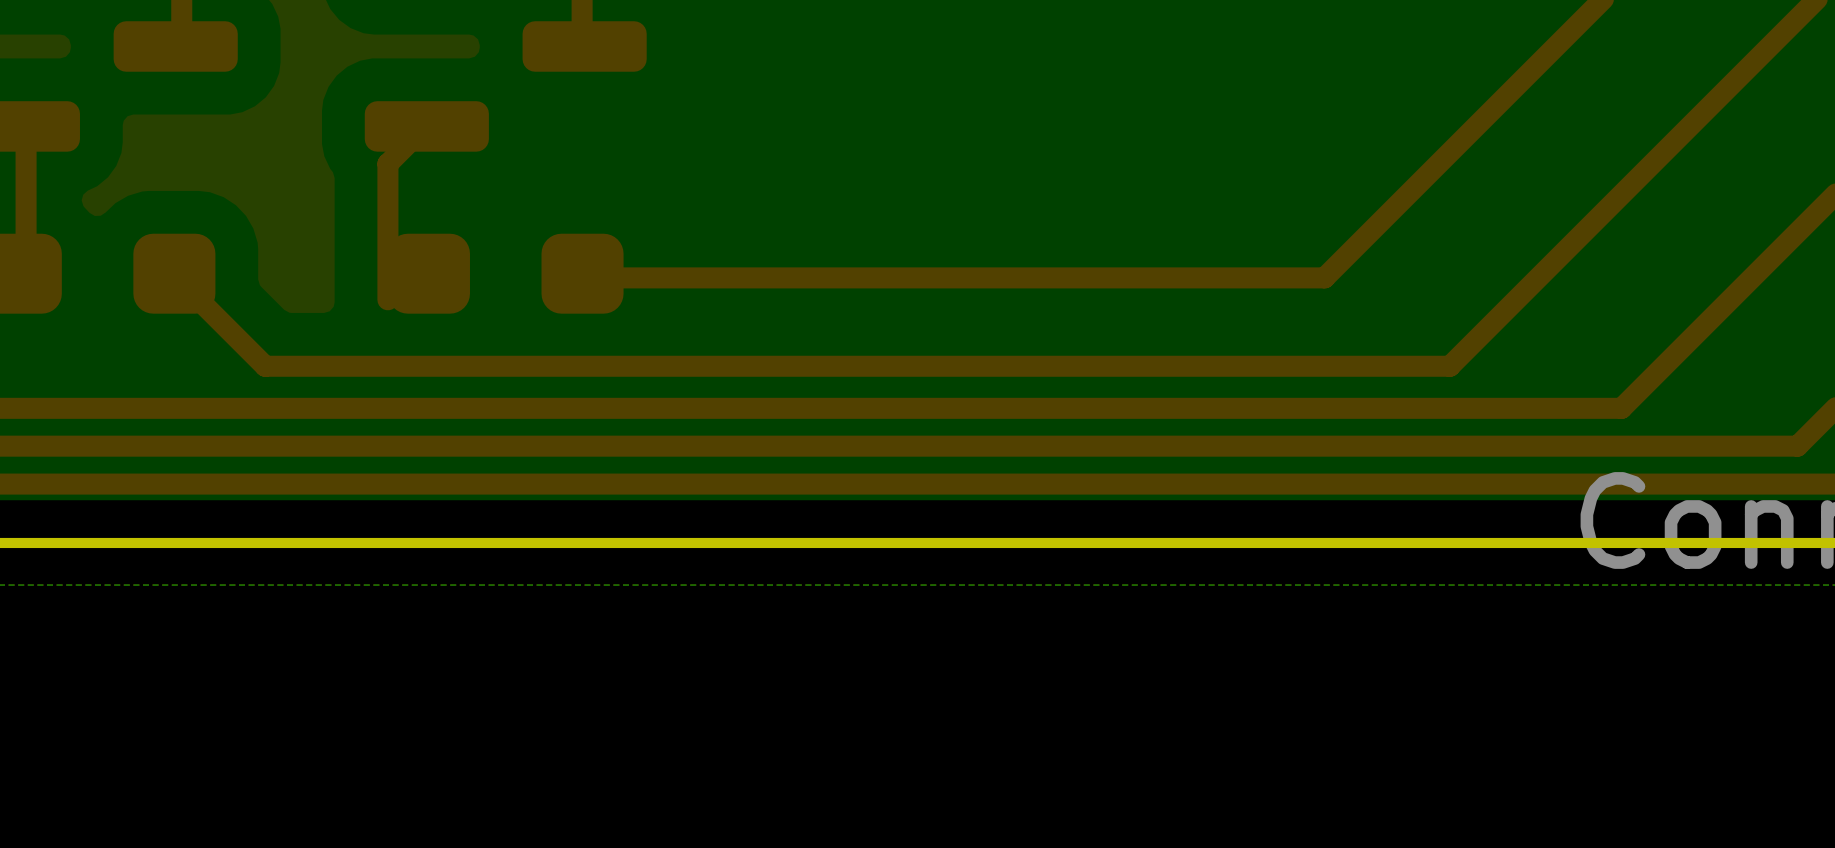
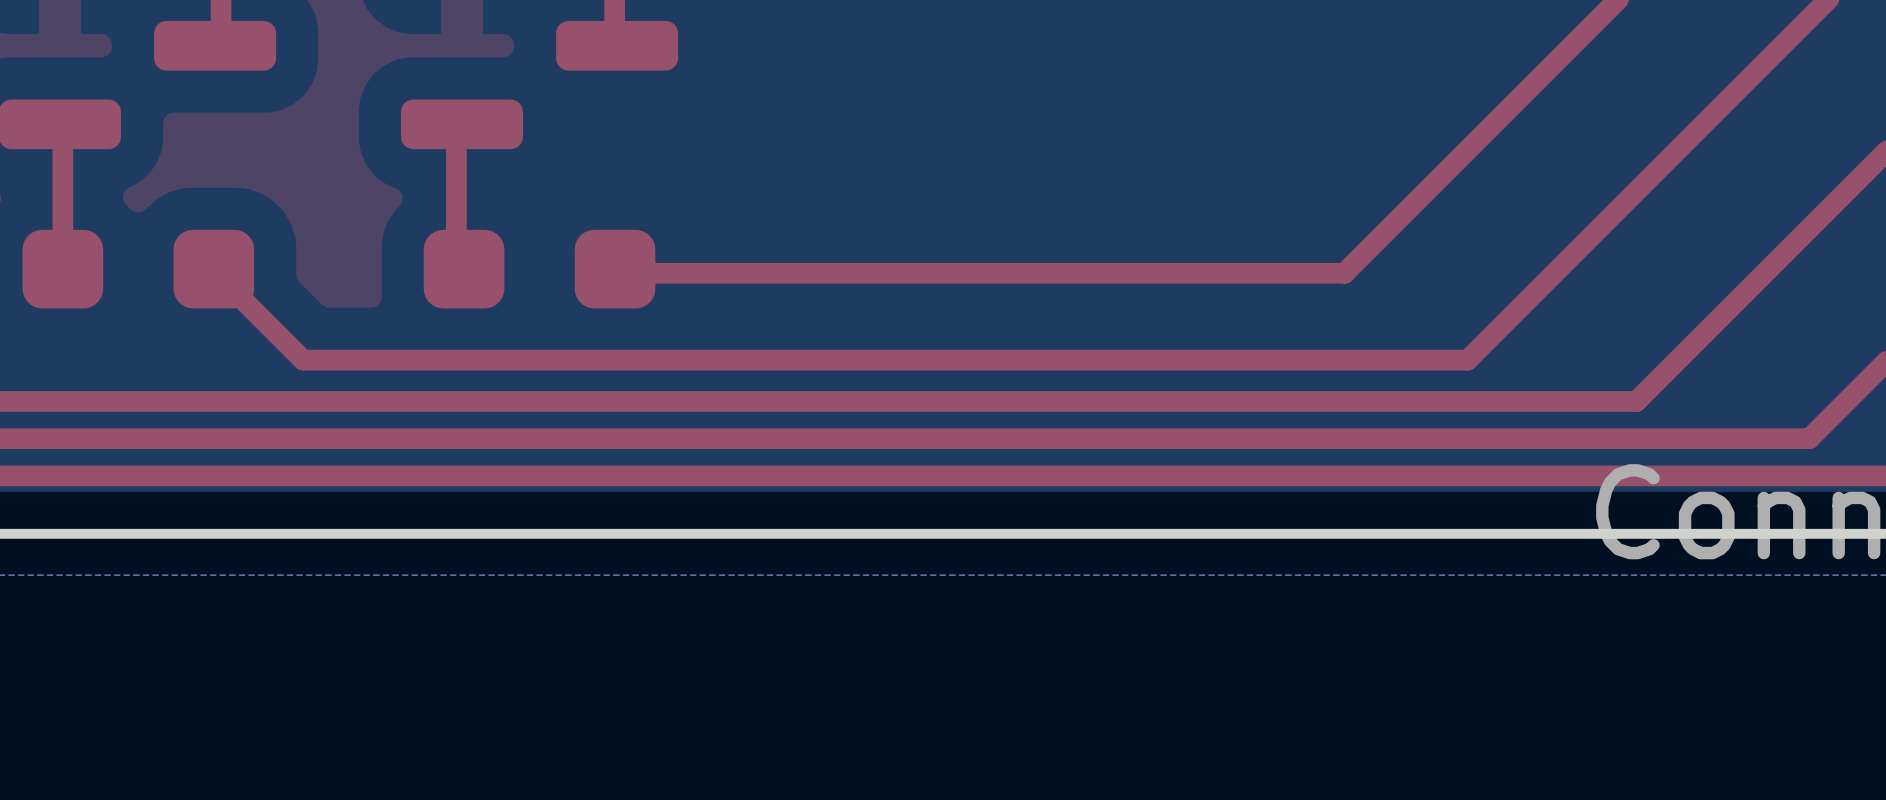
top track: none -> (60, 124) (62, 127) (62, 269)
top track: (421, 130) (387, 163) (387, 299) -> (456, 128) (456, 261) (464, 269)
top track: (26, 140) (26, 298) -> none

